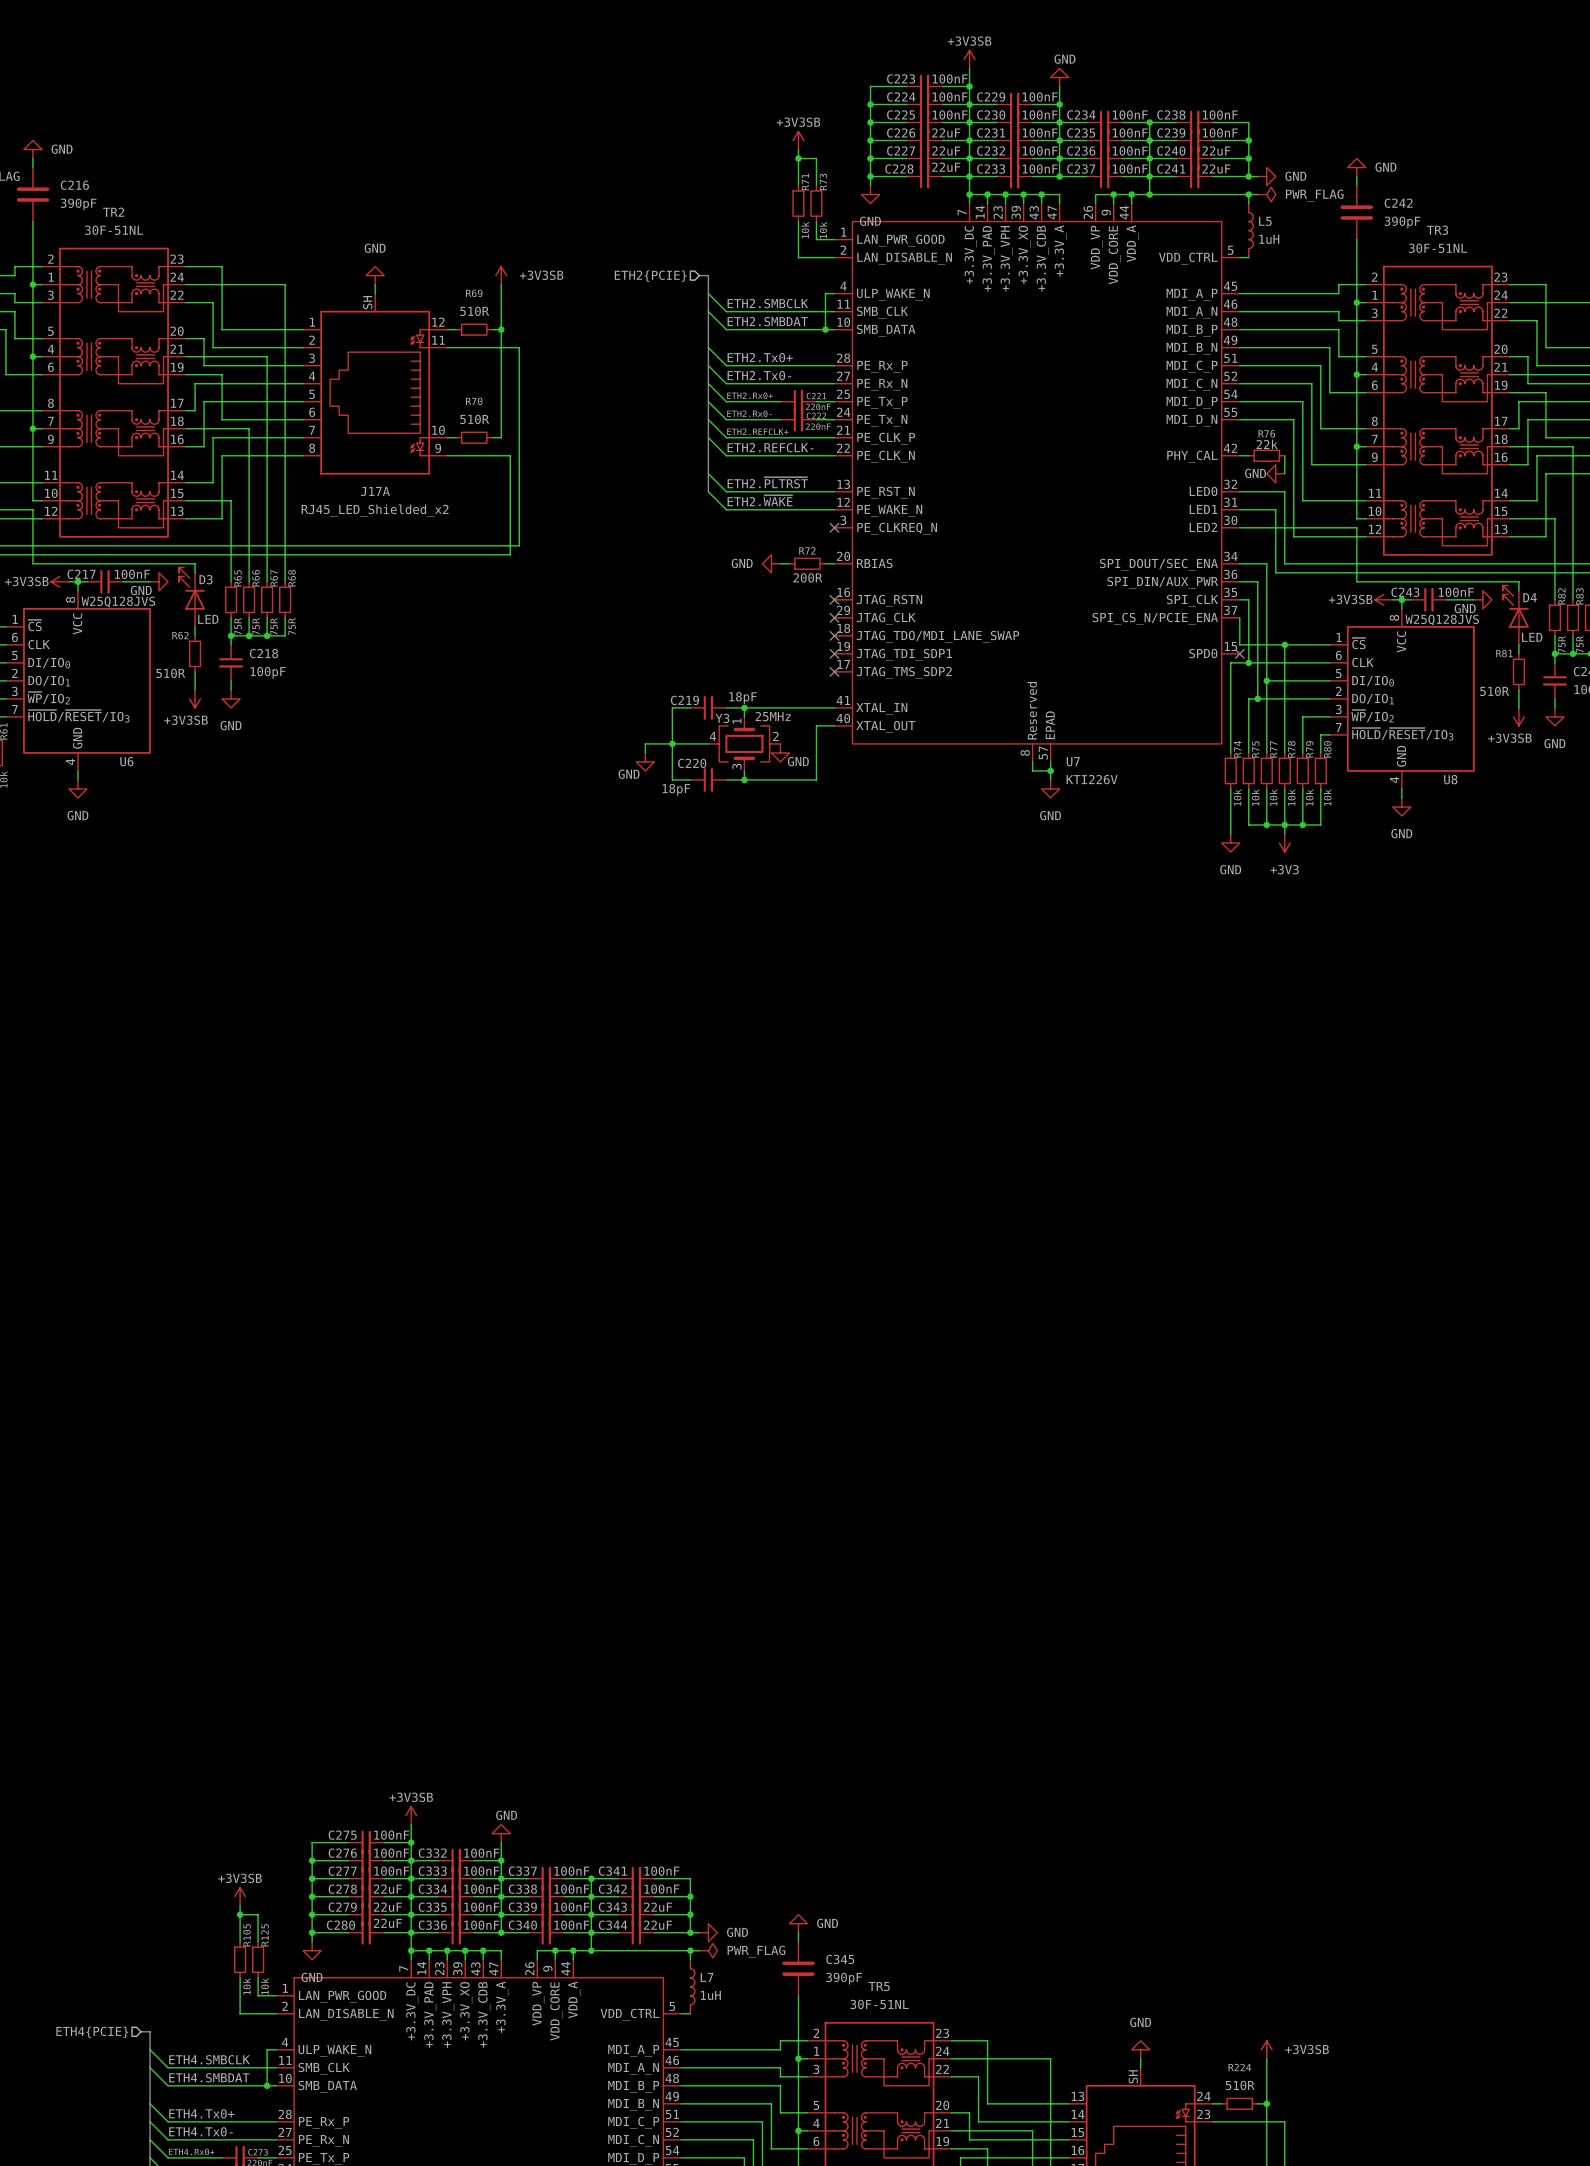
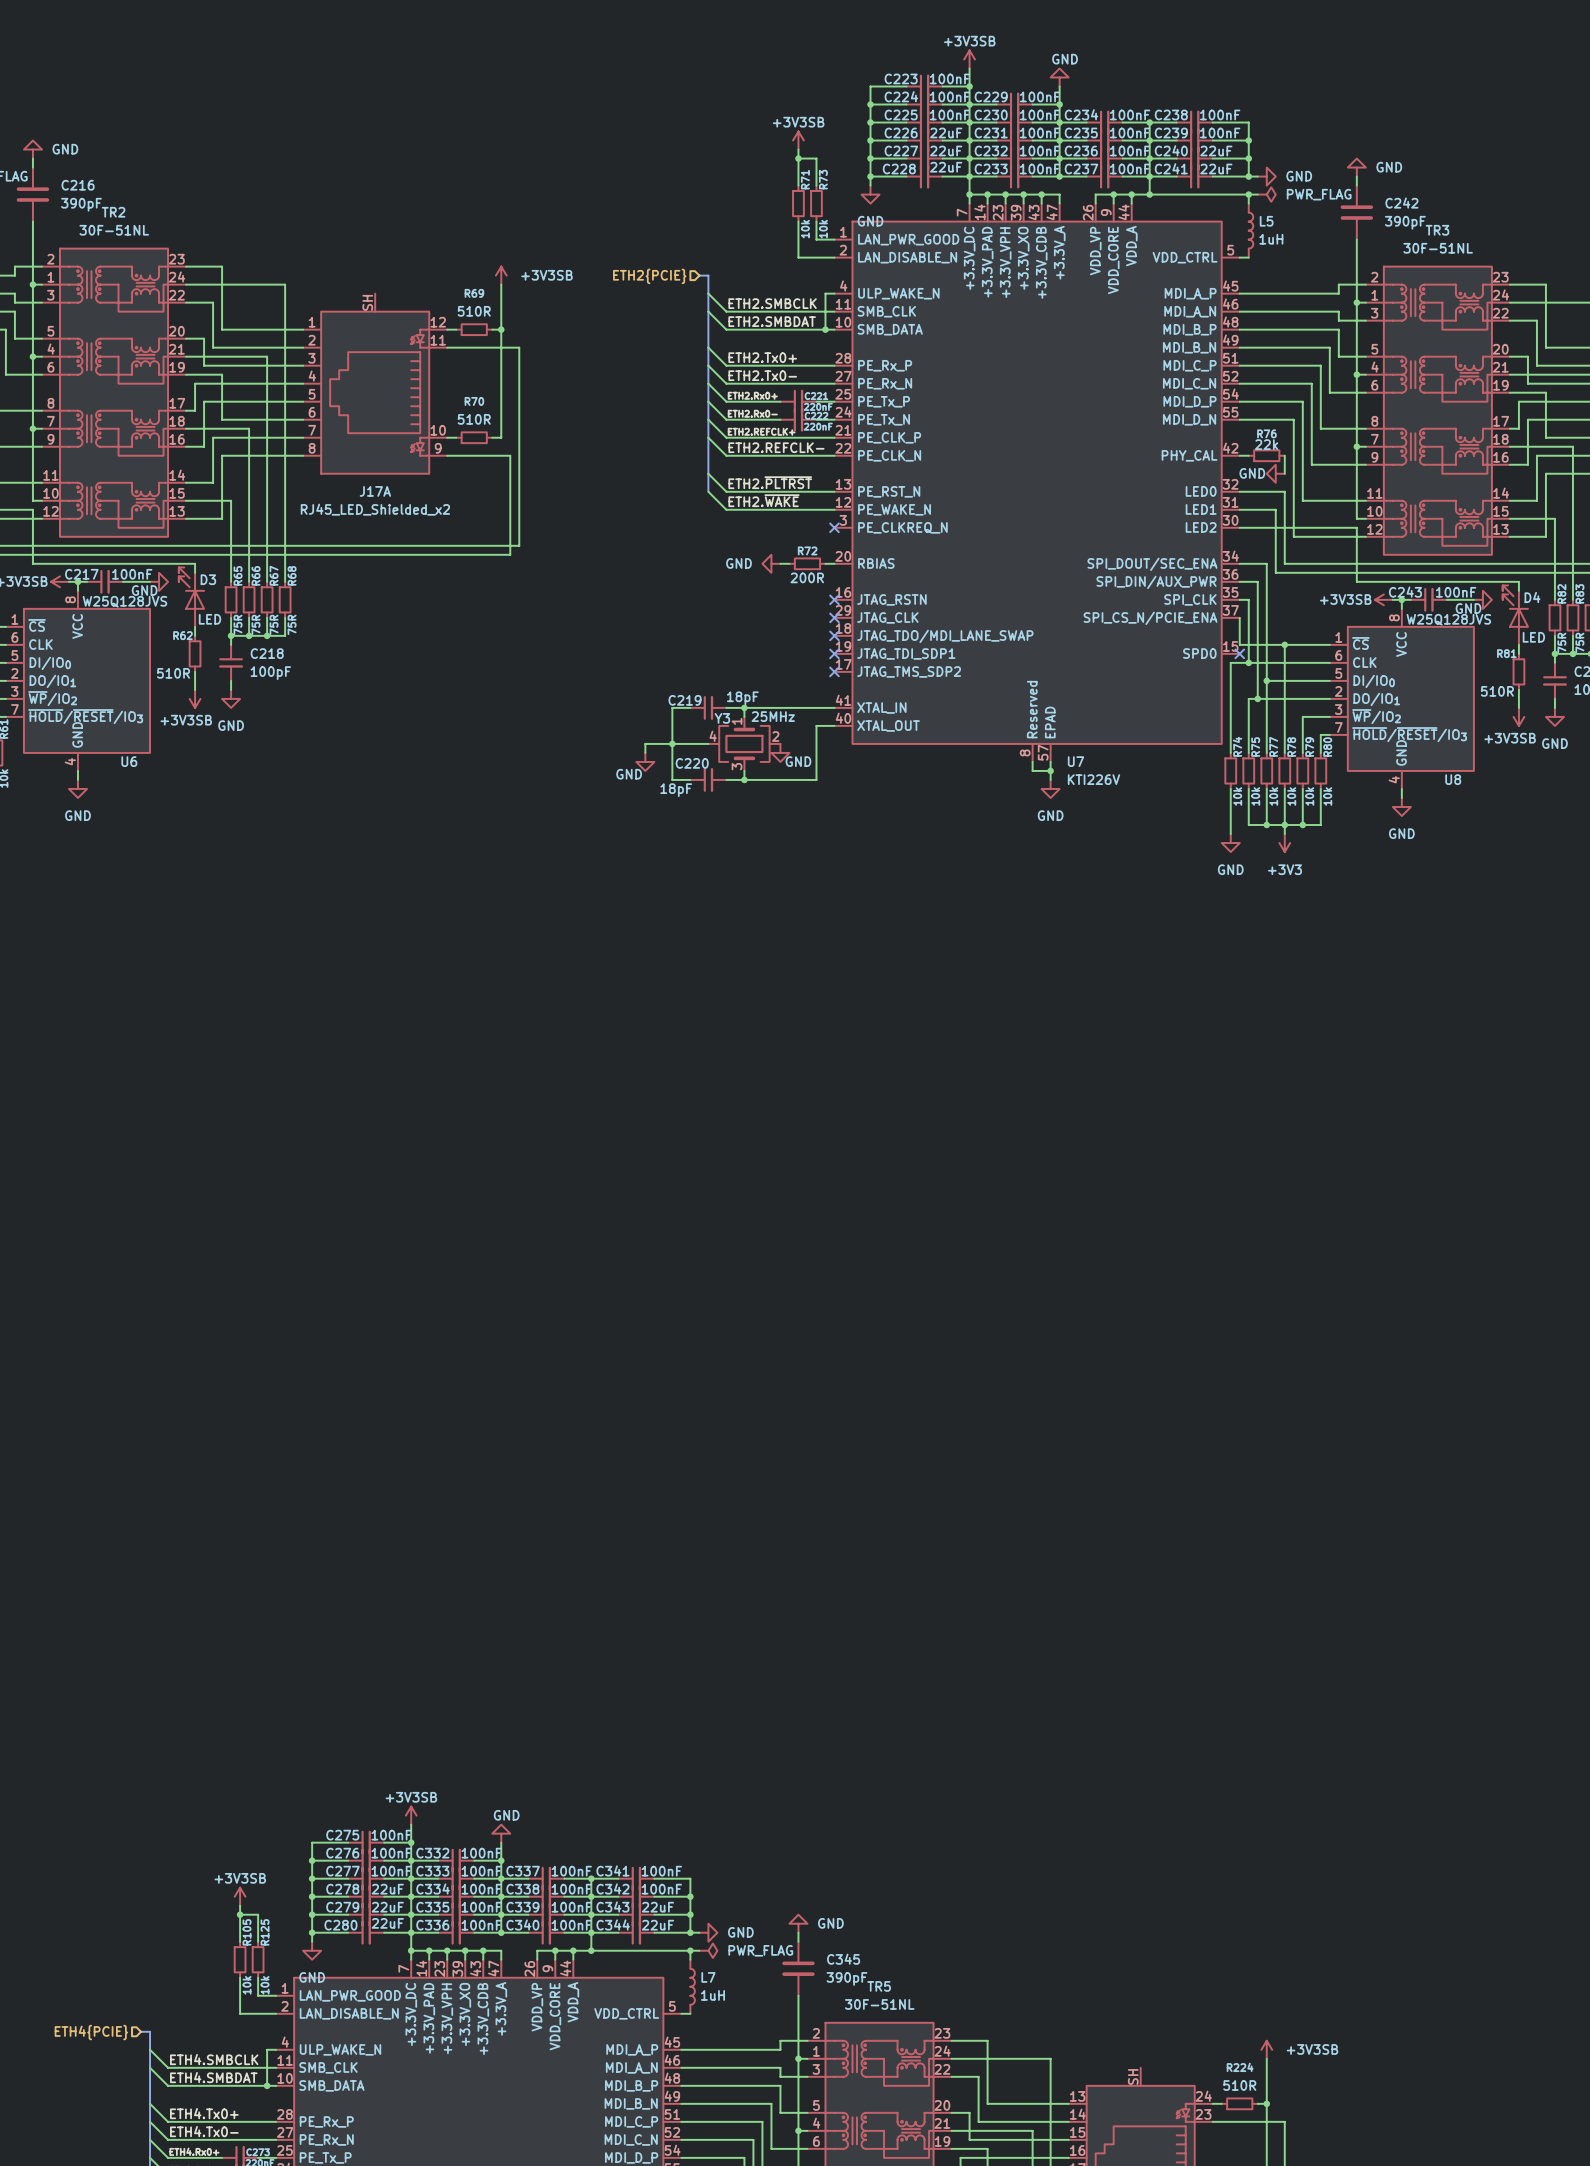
power symbol: GND (375, 275) -> none
wire: (375, 284) (375, 293) -> none
power symbol: GND (1140, 2049) -> none
wire: (1140, 2058) (1140, 2067) -> none

